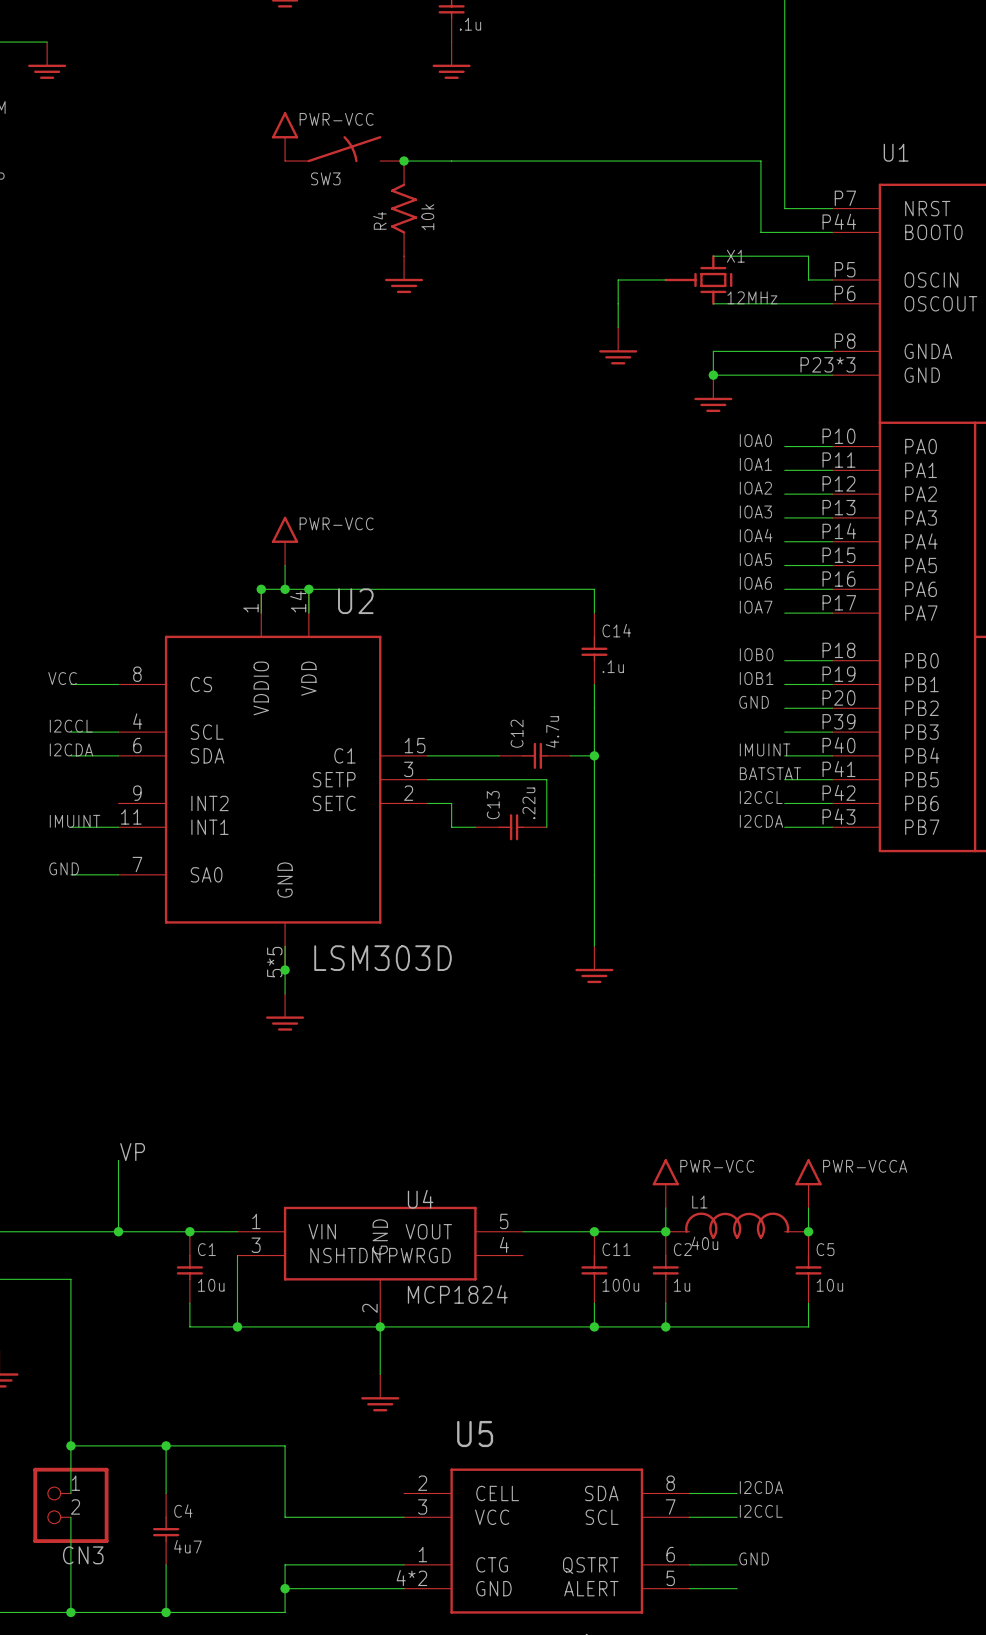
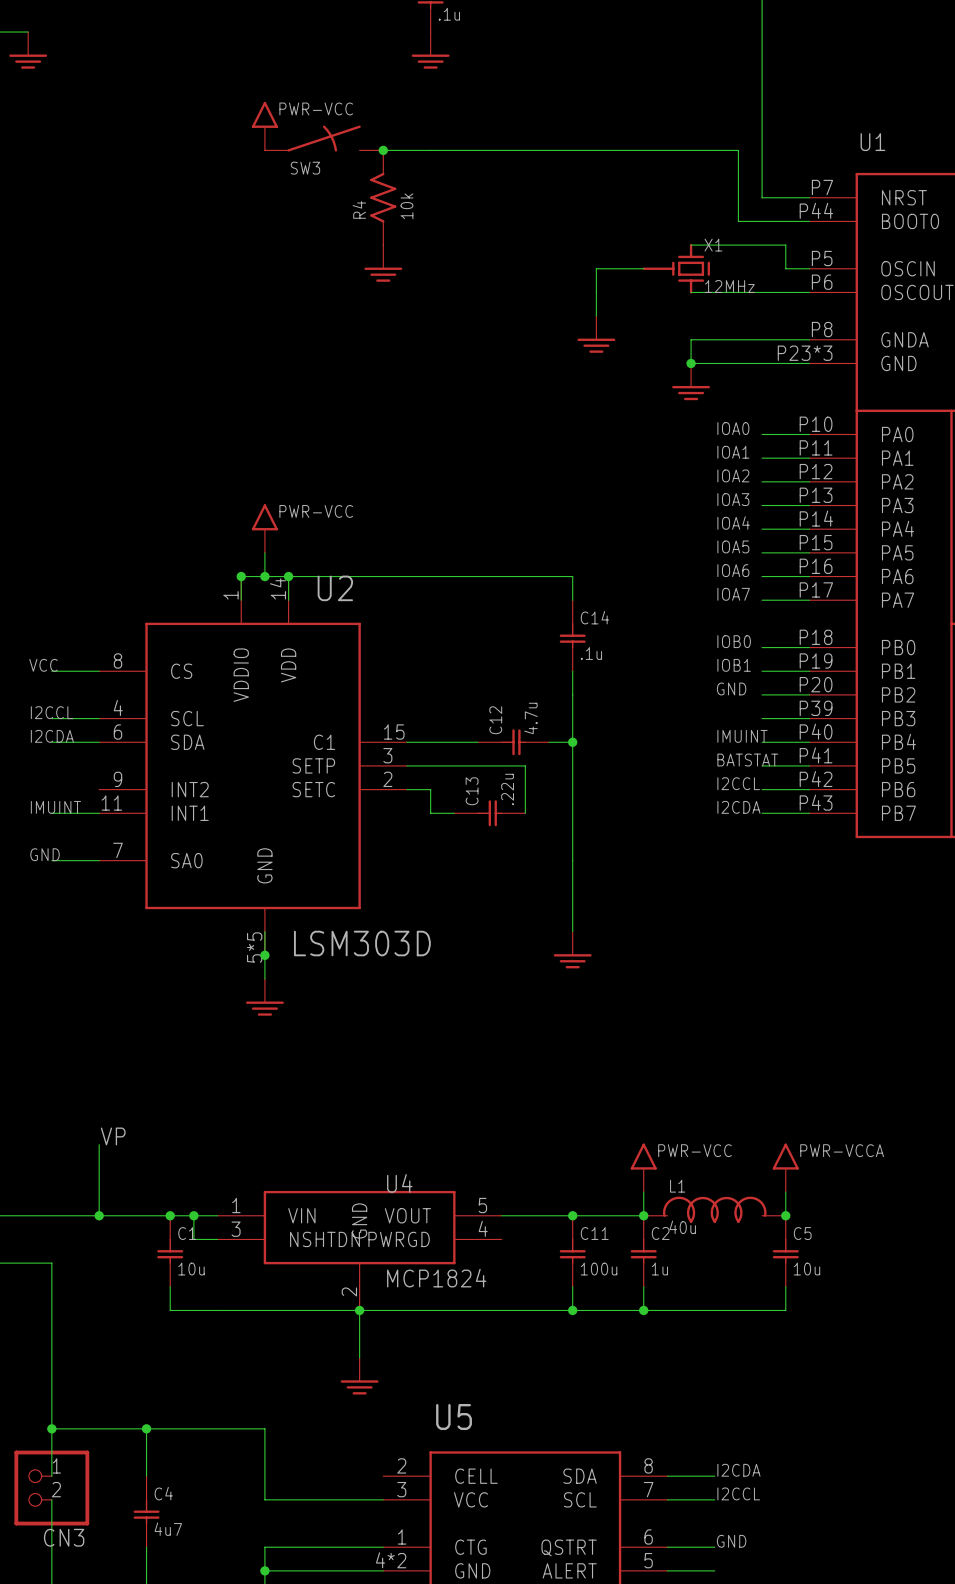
junction: none -> (193, 1215)
wire: (237, 1255) (237, 1326) -> (217, 1239) (193, 1239) (193, 1215)
junction: (237, 1326) -> none

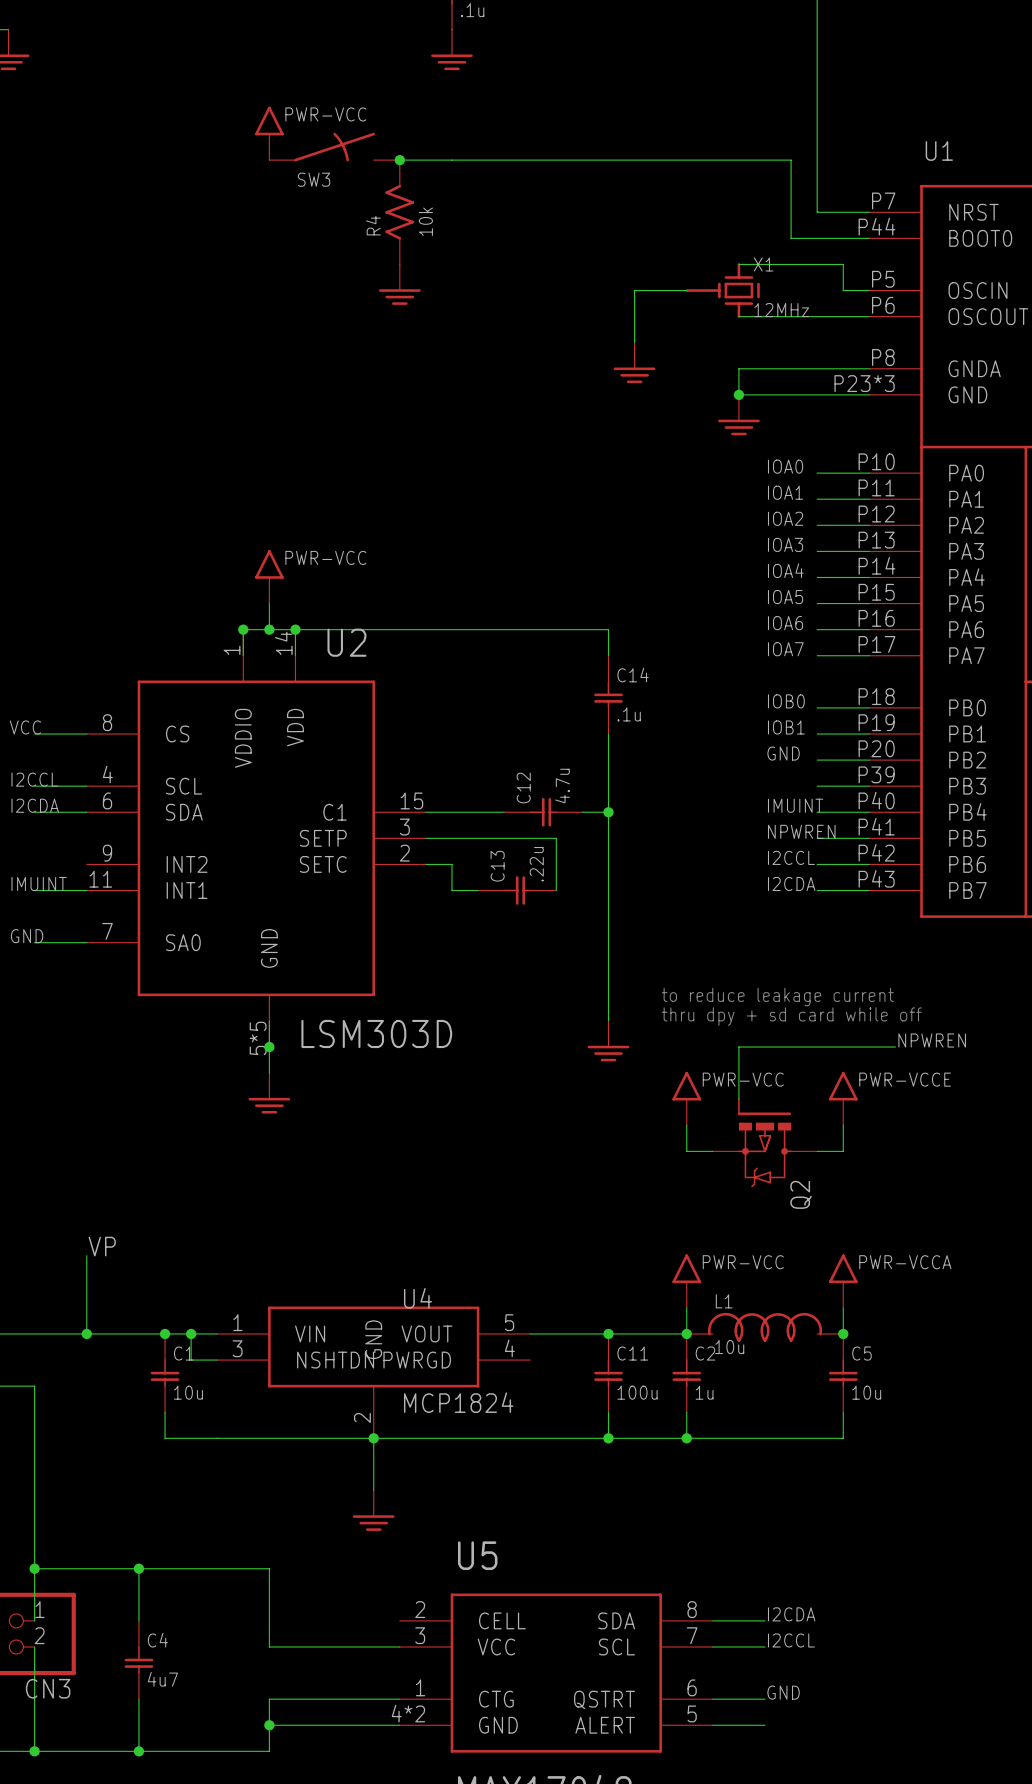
label: BATSTAT (747, 760) -> NPWREN (801, 831)
text: none -> to reduce leakage current (777, 997)
text: none -> thru dpy + sd card while off (791, 1016)
label: none -> NPWREN (932, 1040)
wire: none -> (895, 1047) (738, 1047) (738, 1099)
power symbol: none -> PWR-VCC (686, 1098)
power symbol: none -> PWR-VCCE (843, 1098)
wire: none -> (686, 1125) (686, 1151) (712, 1151)
wire: none -> (843, 1125) (843, 1151) (817, 1151)
Q2: none -> (765, 1142)
L1 value: 40u (682, 1227) -> 10u (729, 1347)

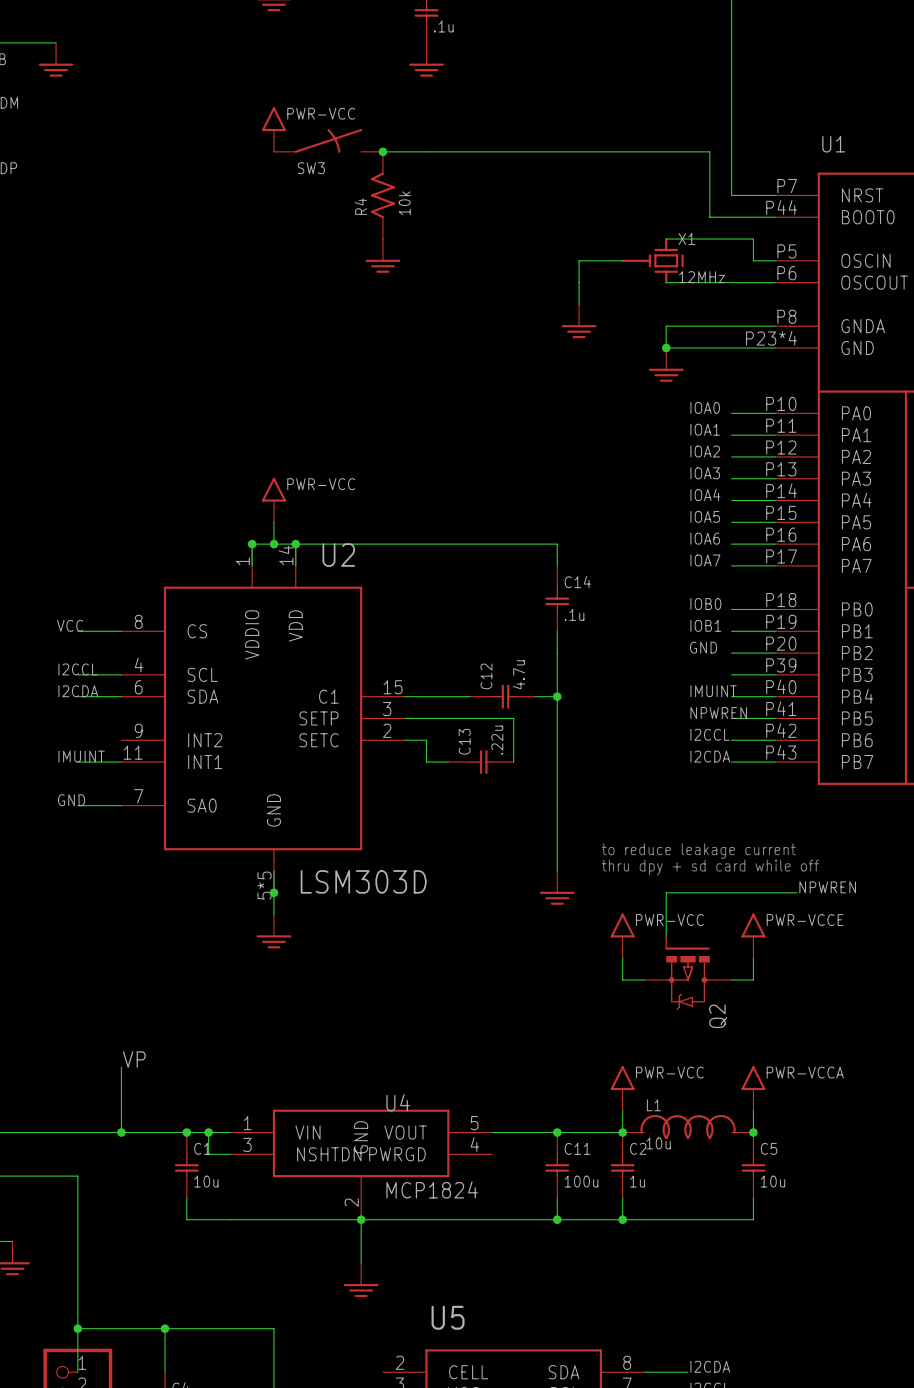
U1 pin number: P23*3 (864, 383) -> P23*4 (771, 338)

